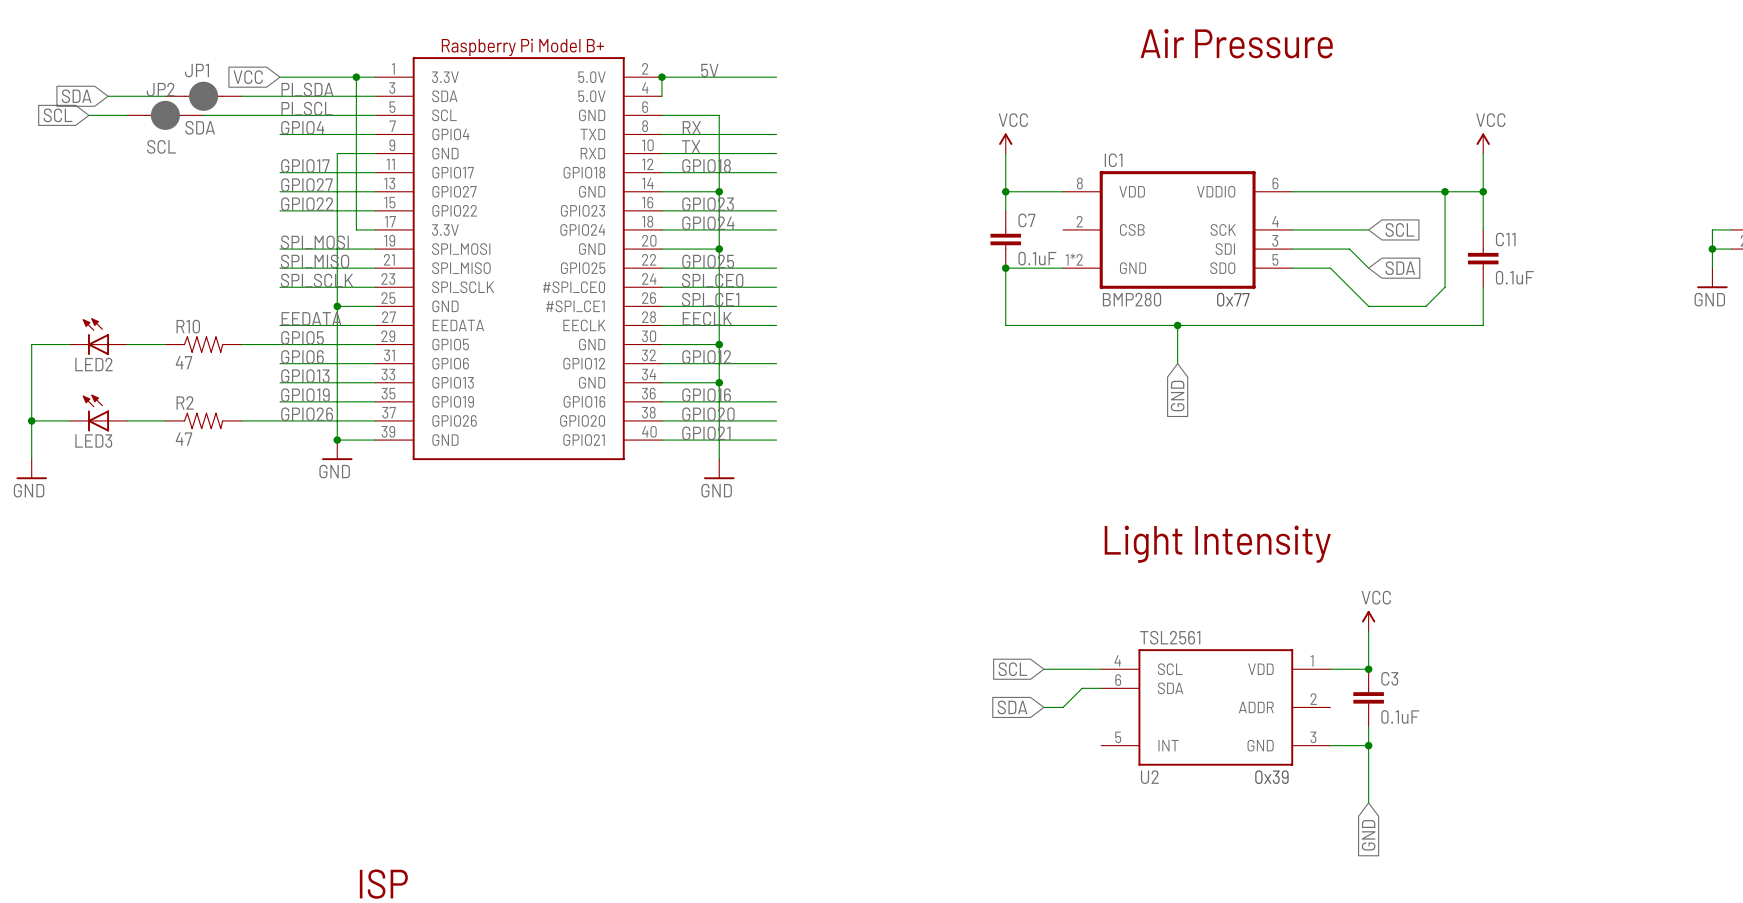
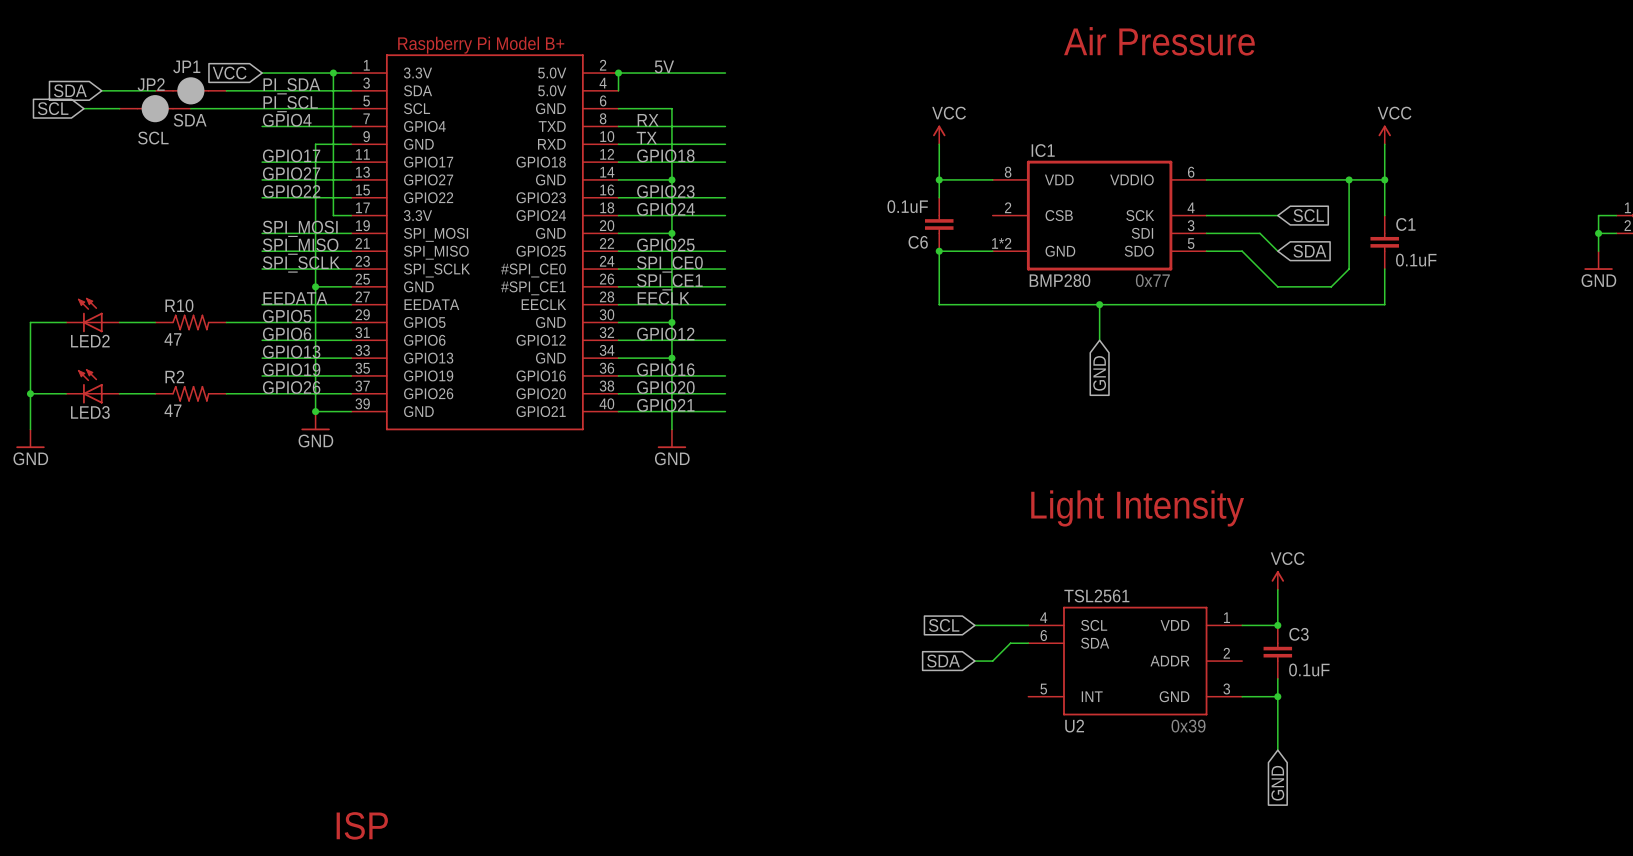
C7 name: C7 (1026, 220) -> C6 (918, 242)
C11 name: C11 (1505, 239) -> C1 (1405, 224)
C7 value position: 0.1uF (1037, 258) -> 0.1uF (907, 206)

